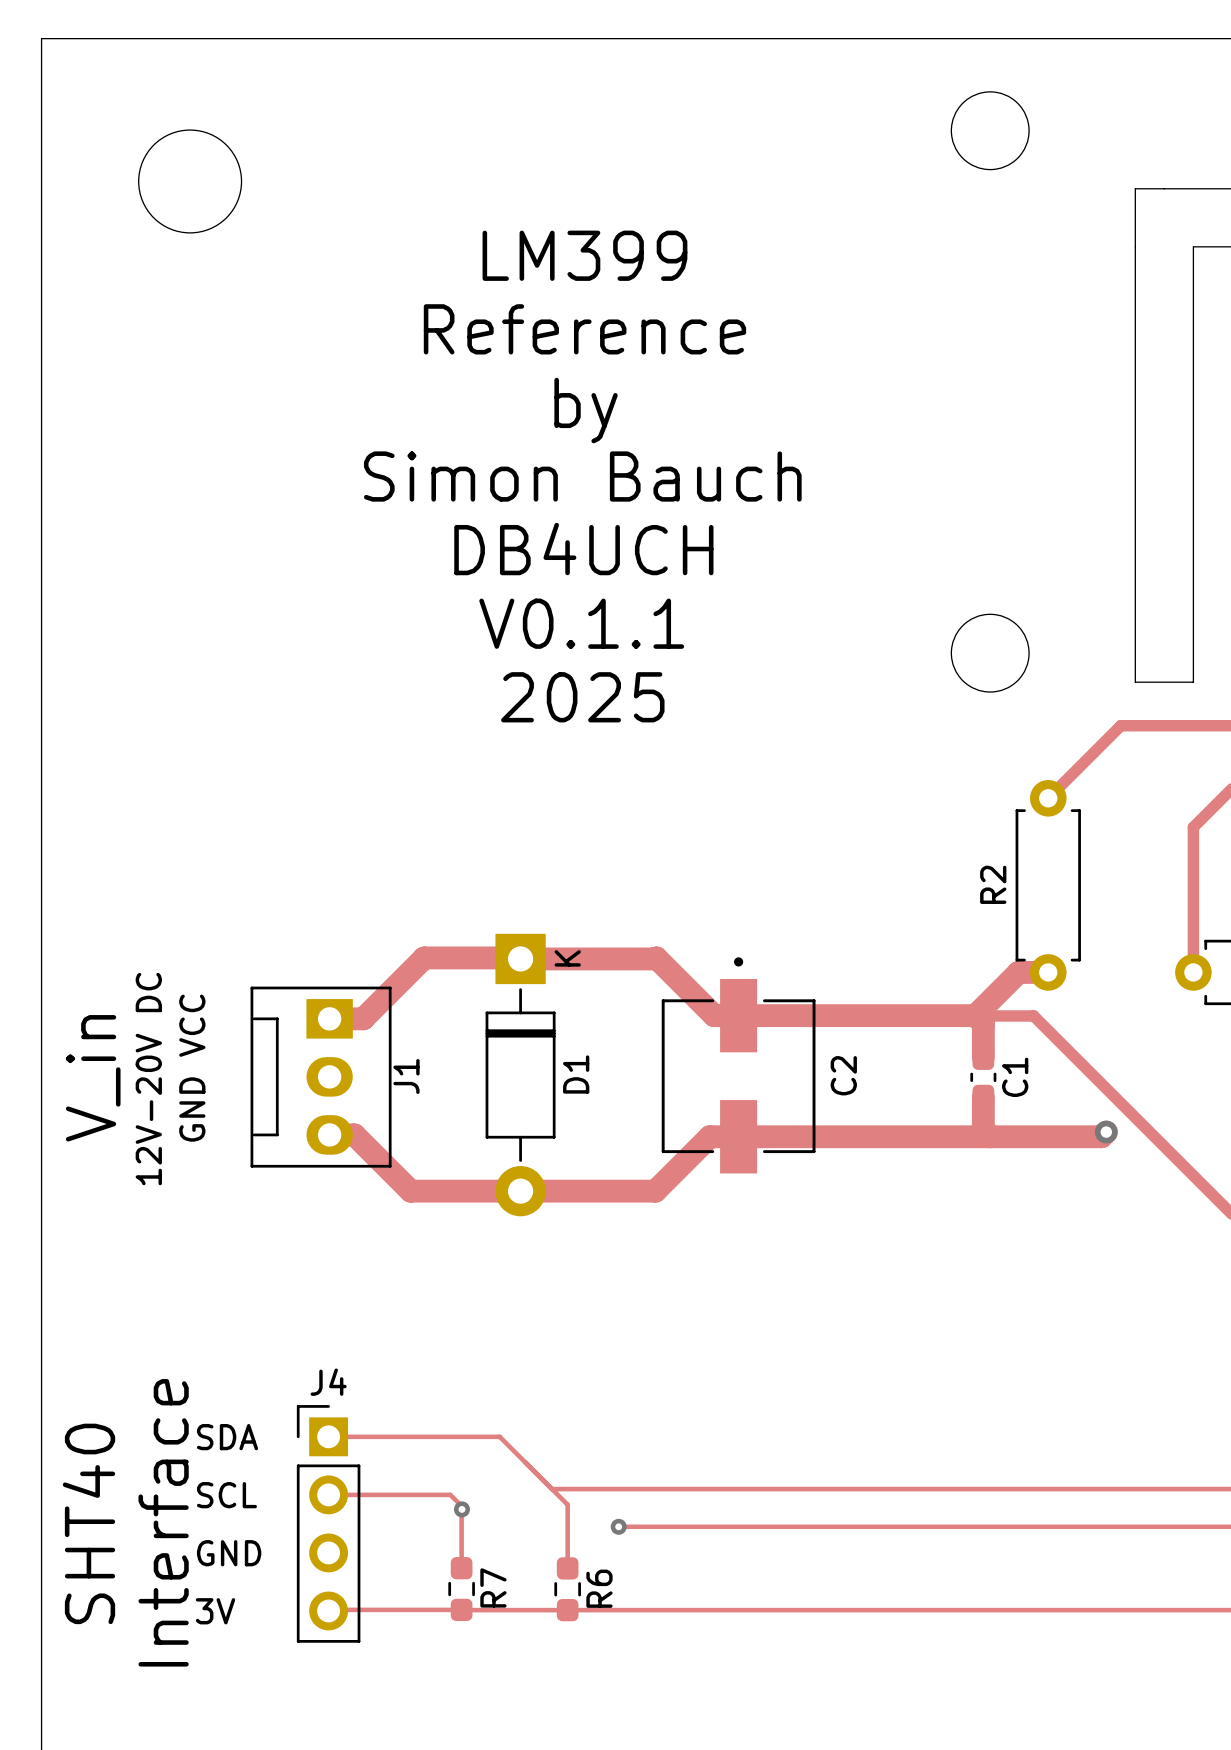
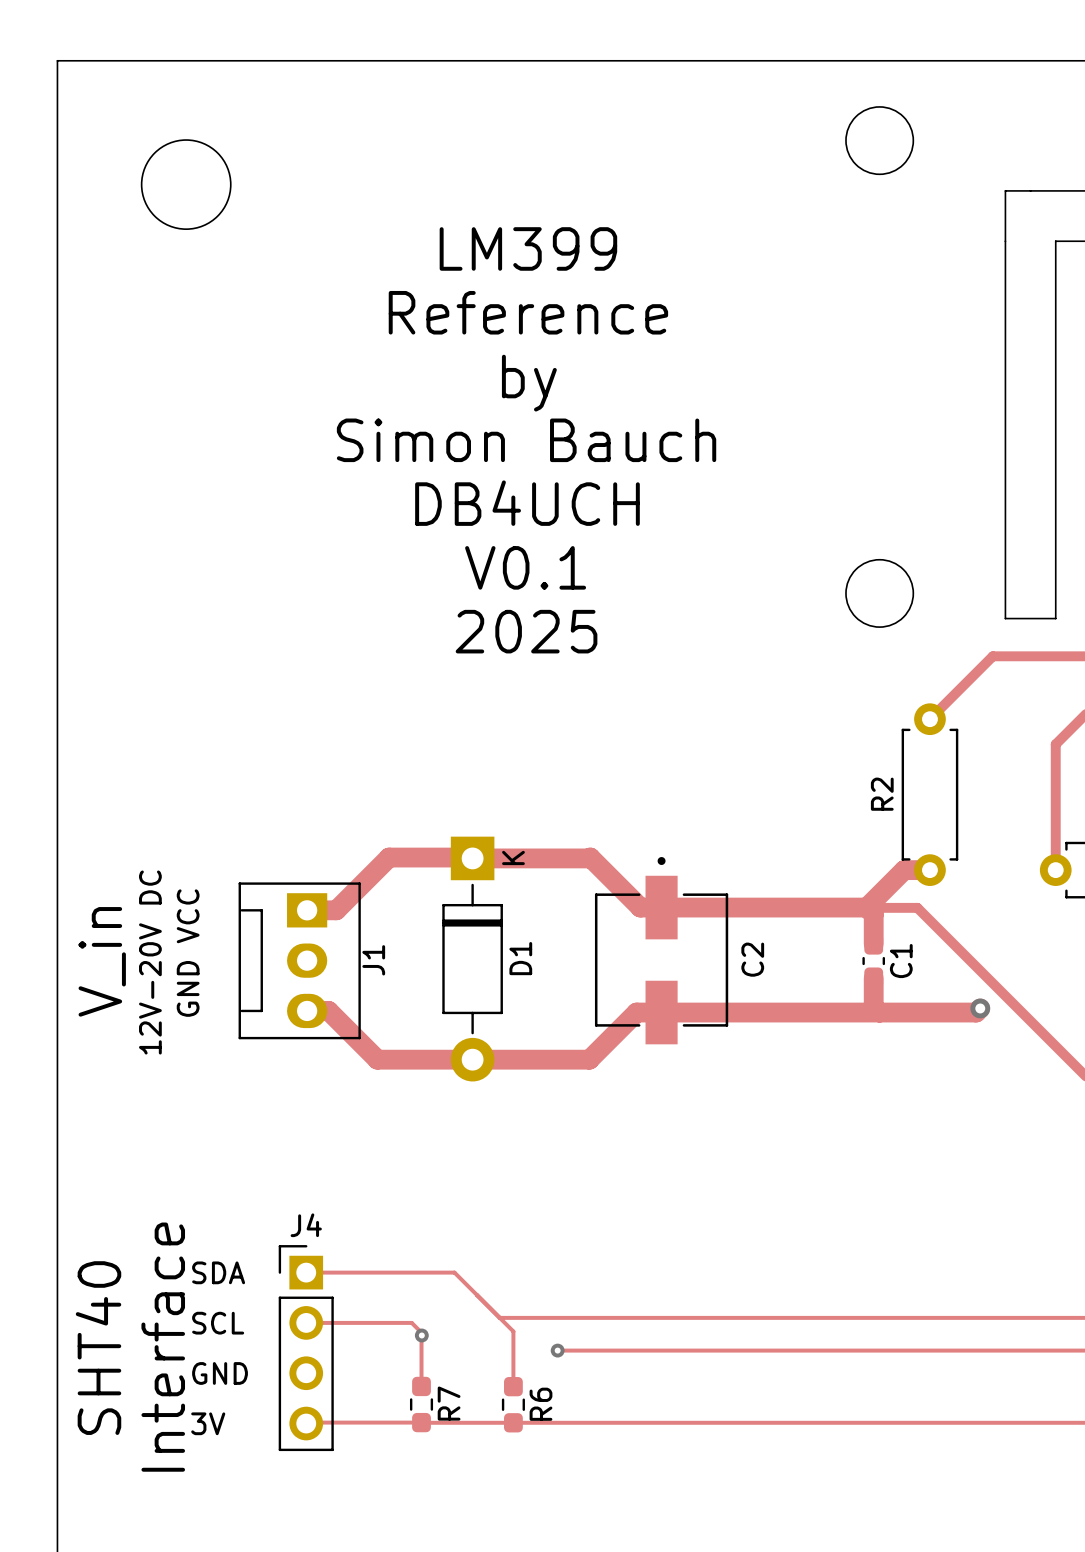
text: V0.1.1 (581, 623) -> V0.1 (525, 567)

